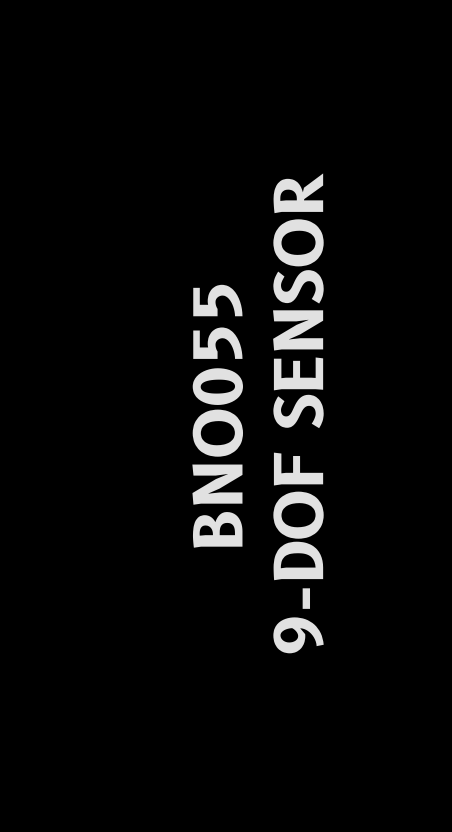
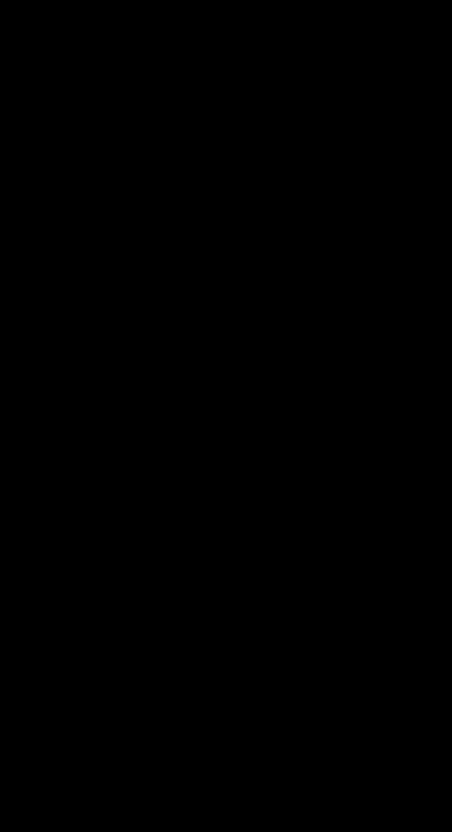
text: 9-DOF SENSOR (298, 413) -> none
text: BNO055 (217, 416) -> none

